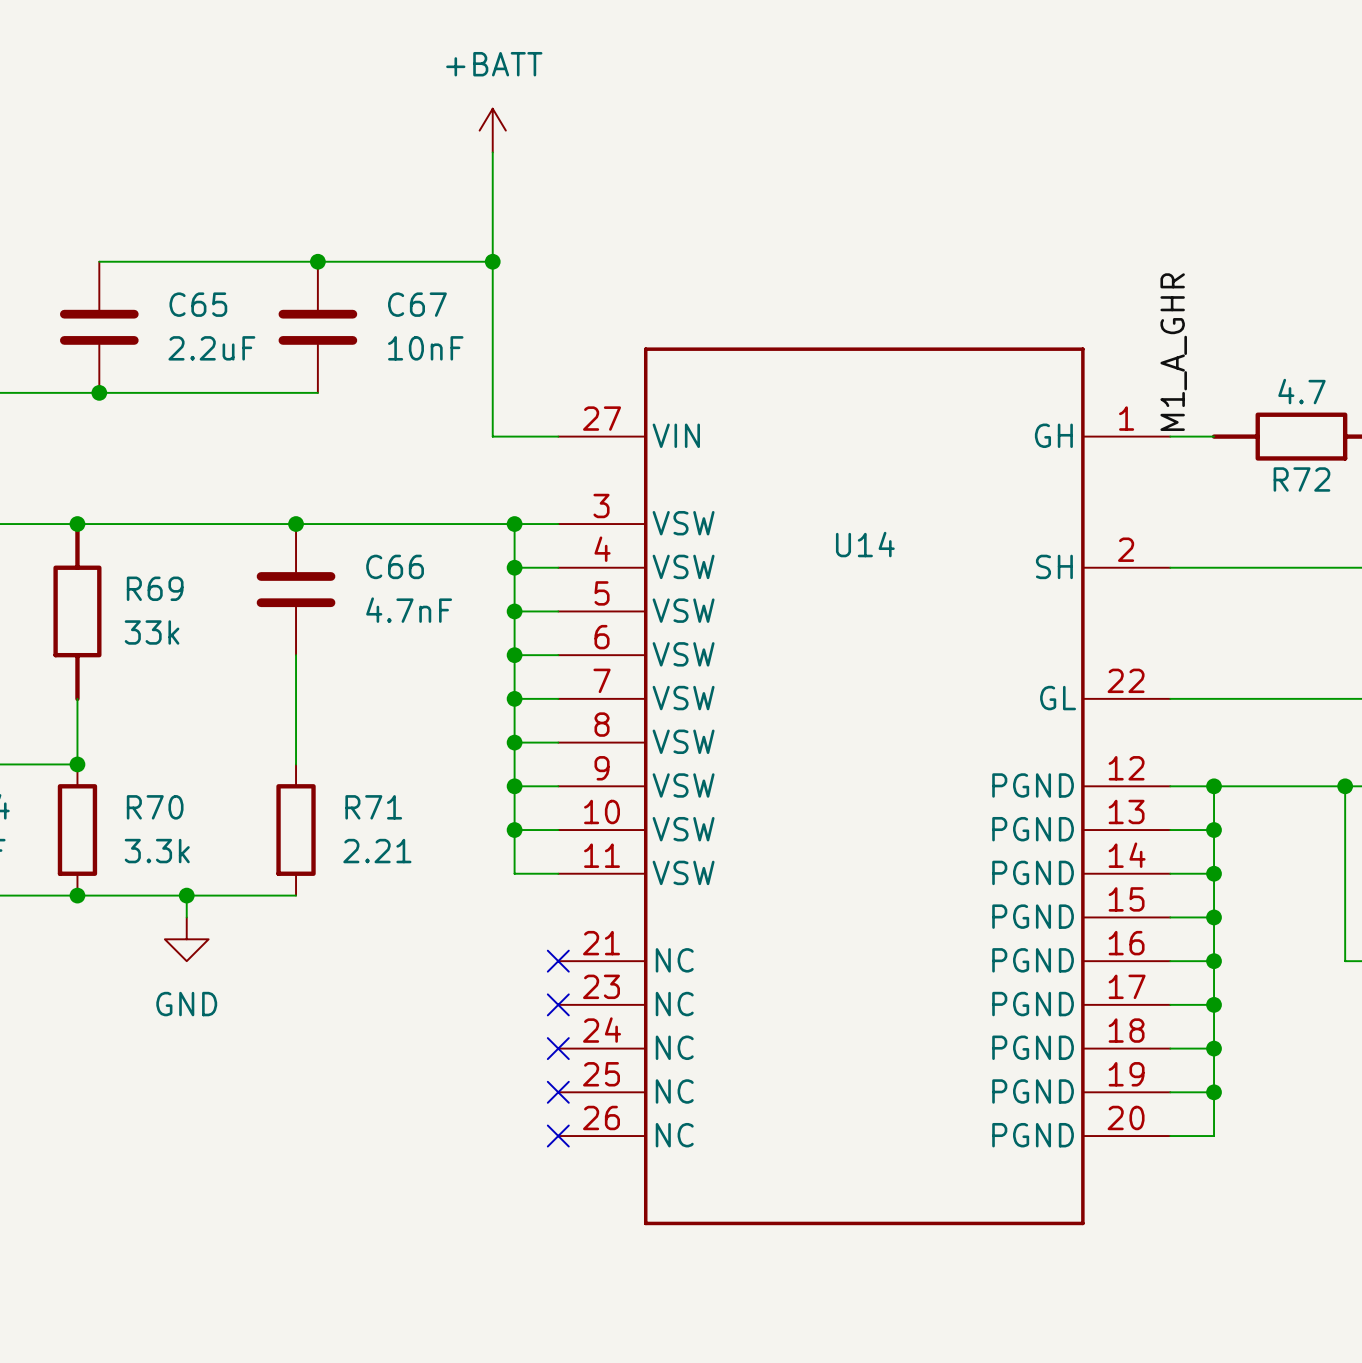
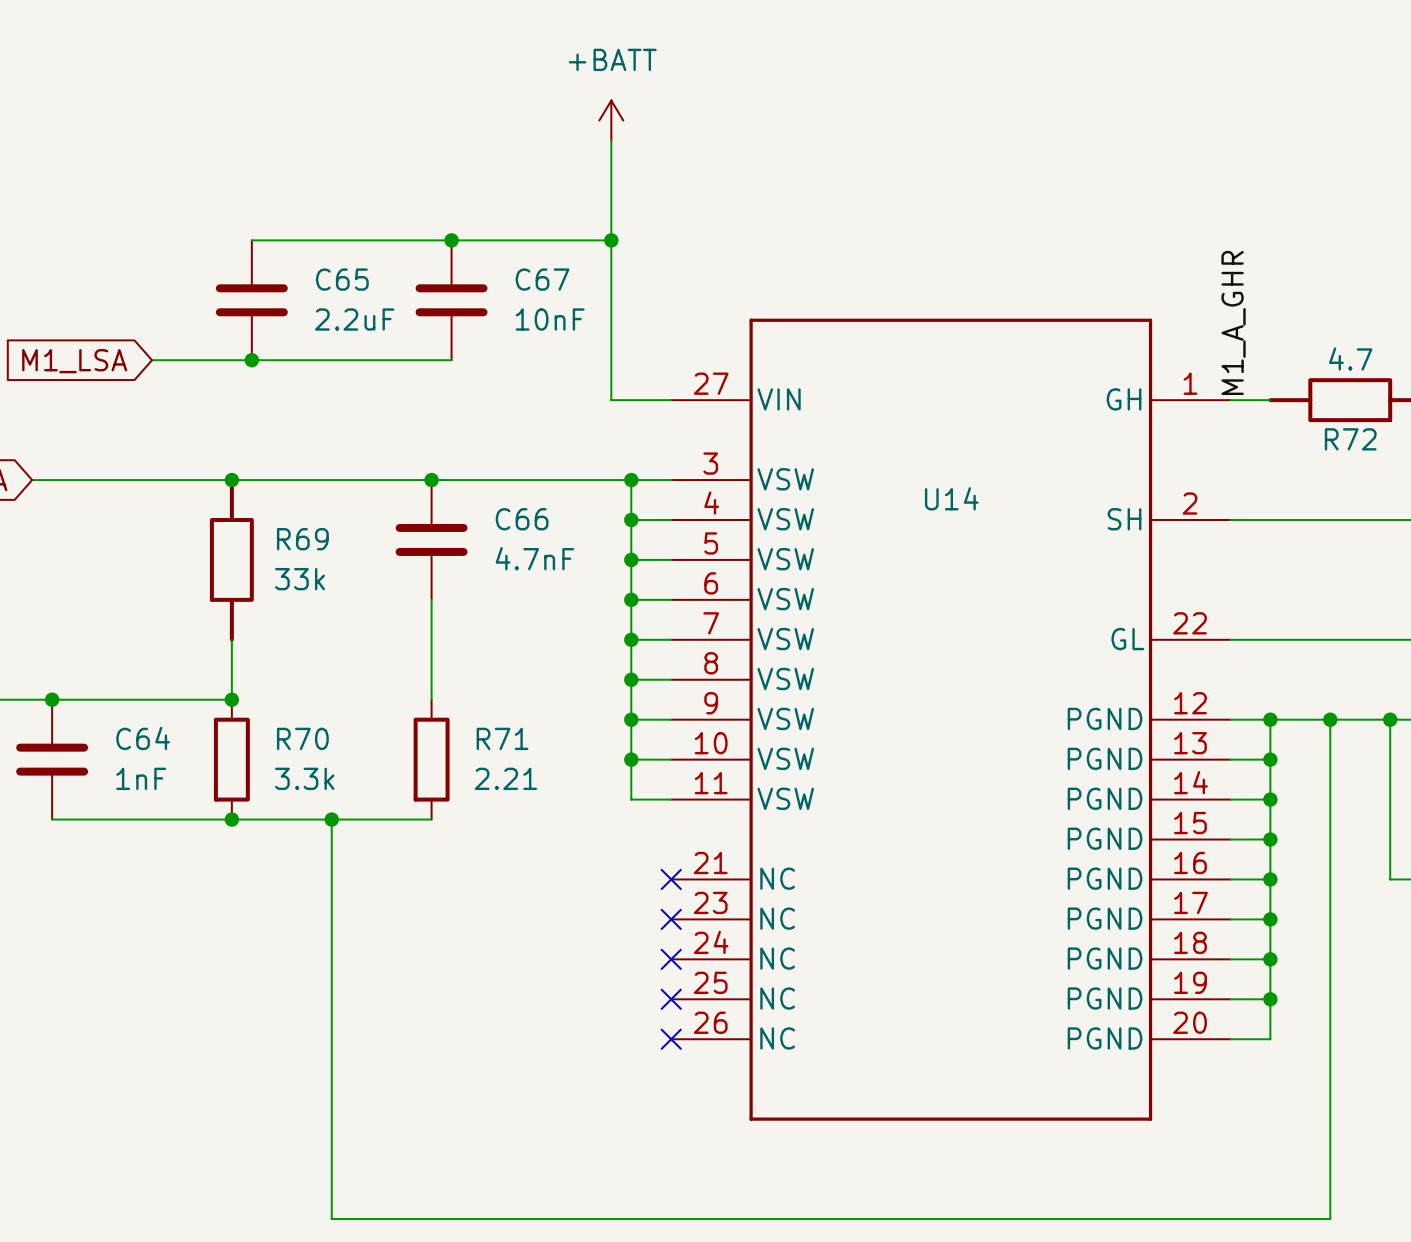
wire: none -> (1330, 719) (1330, 1218) (331, 1218) (331, 839)
junction: none -> (1330, 719)
power symbol: GND (186, 939) -> none

